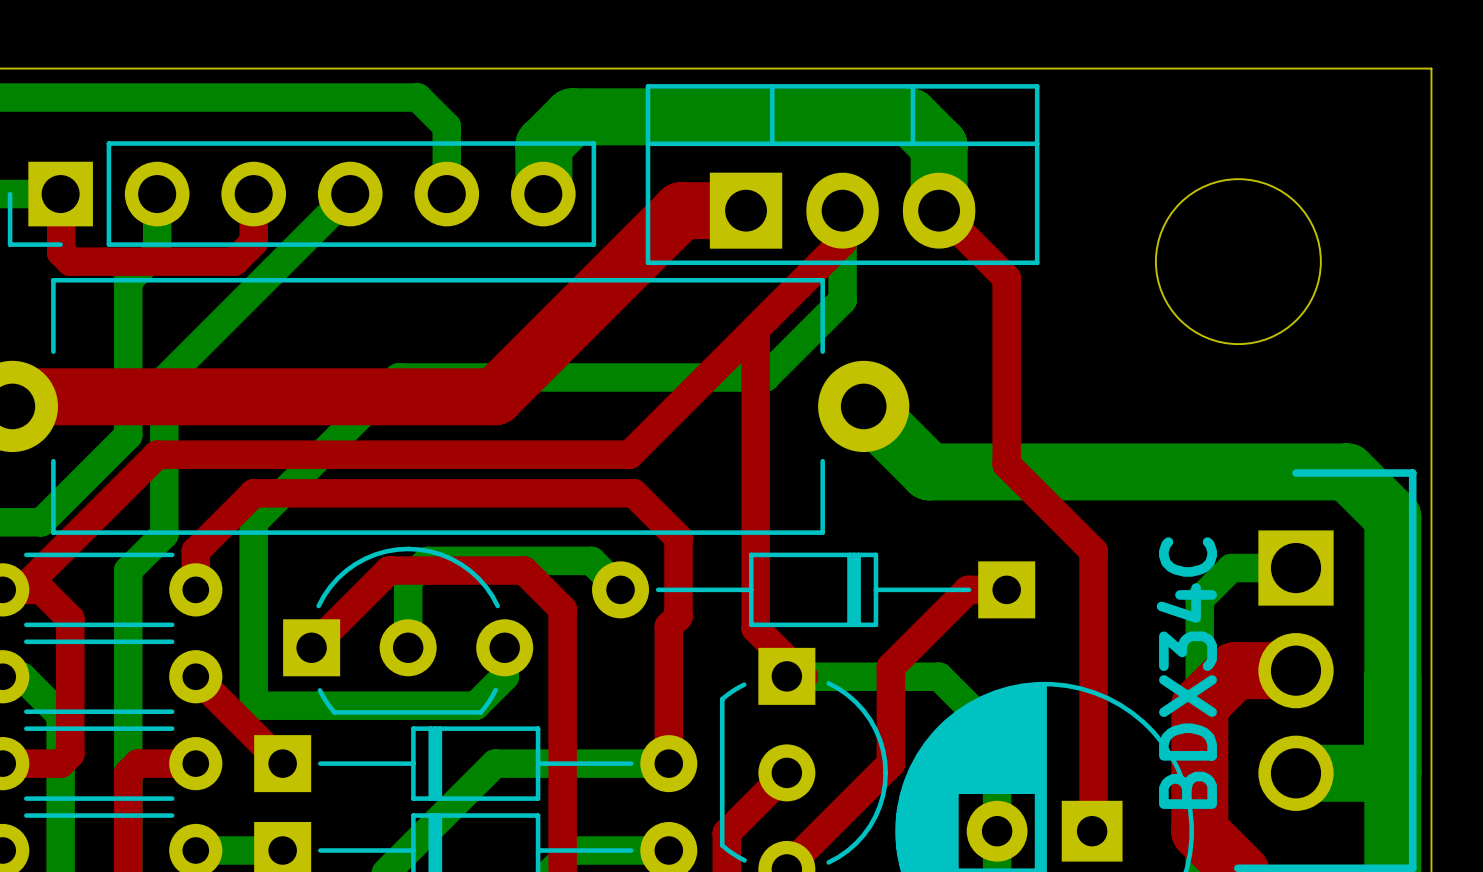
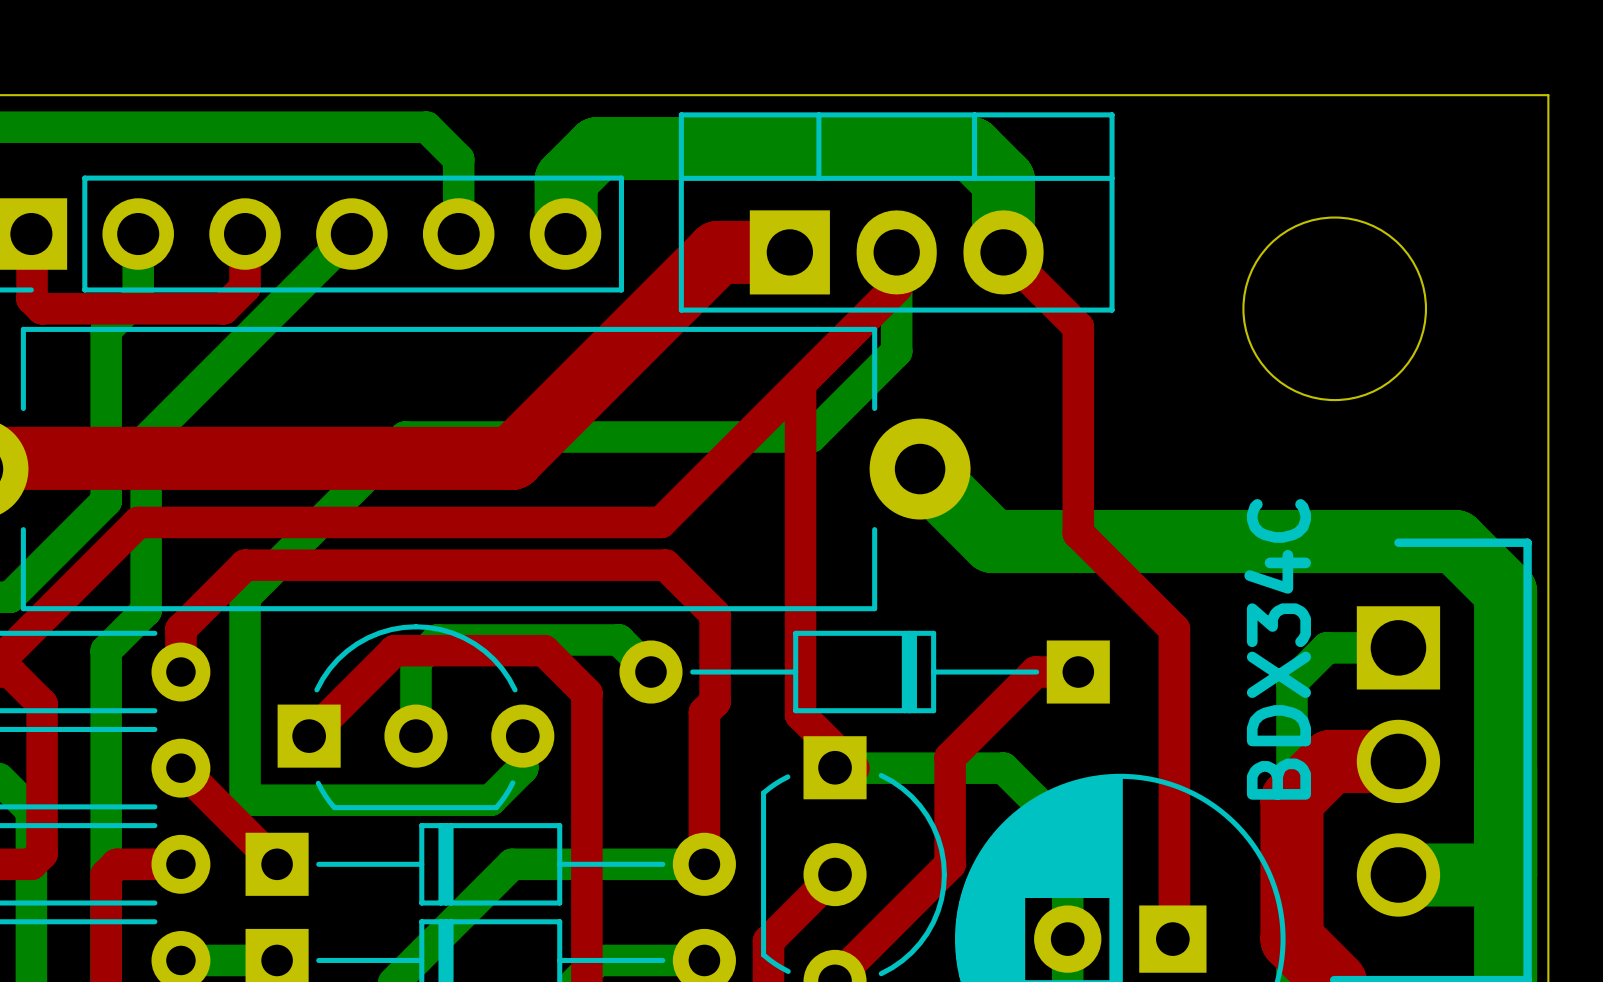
part value position: BDX34C (1186, 673) -> BDX34C (1277, 649)

